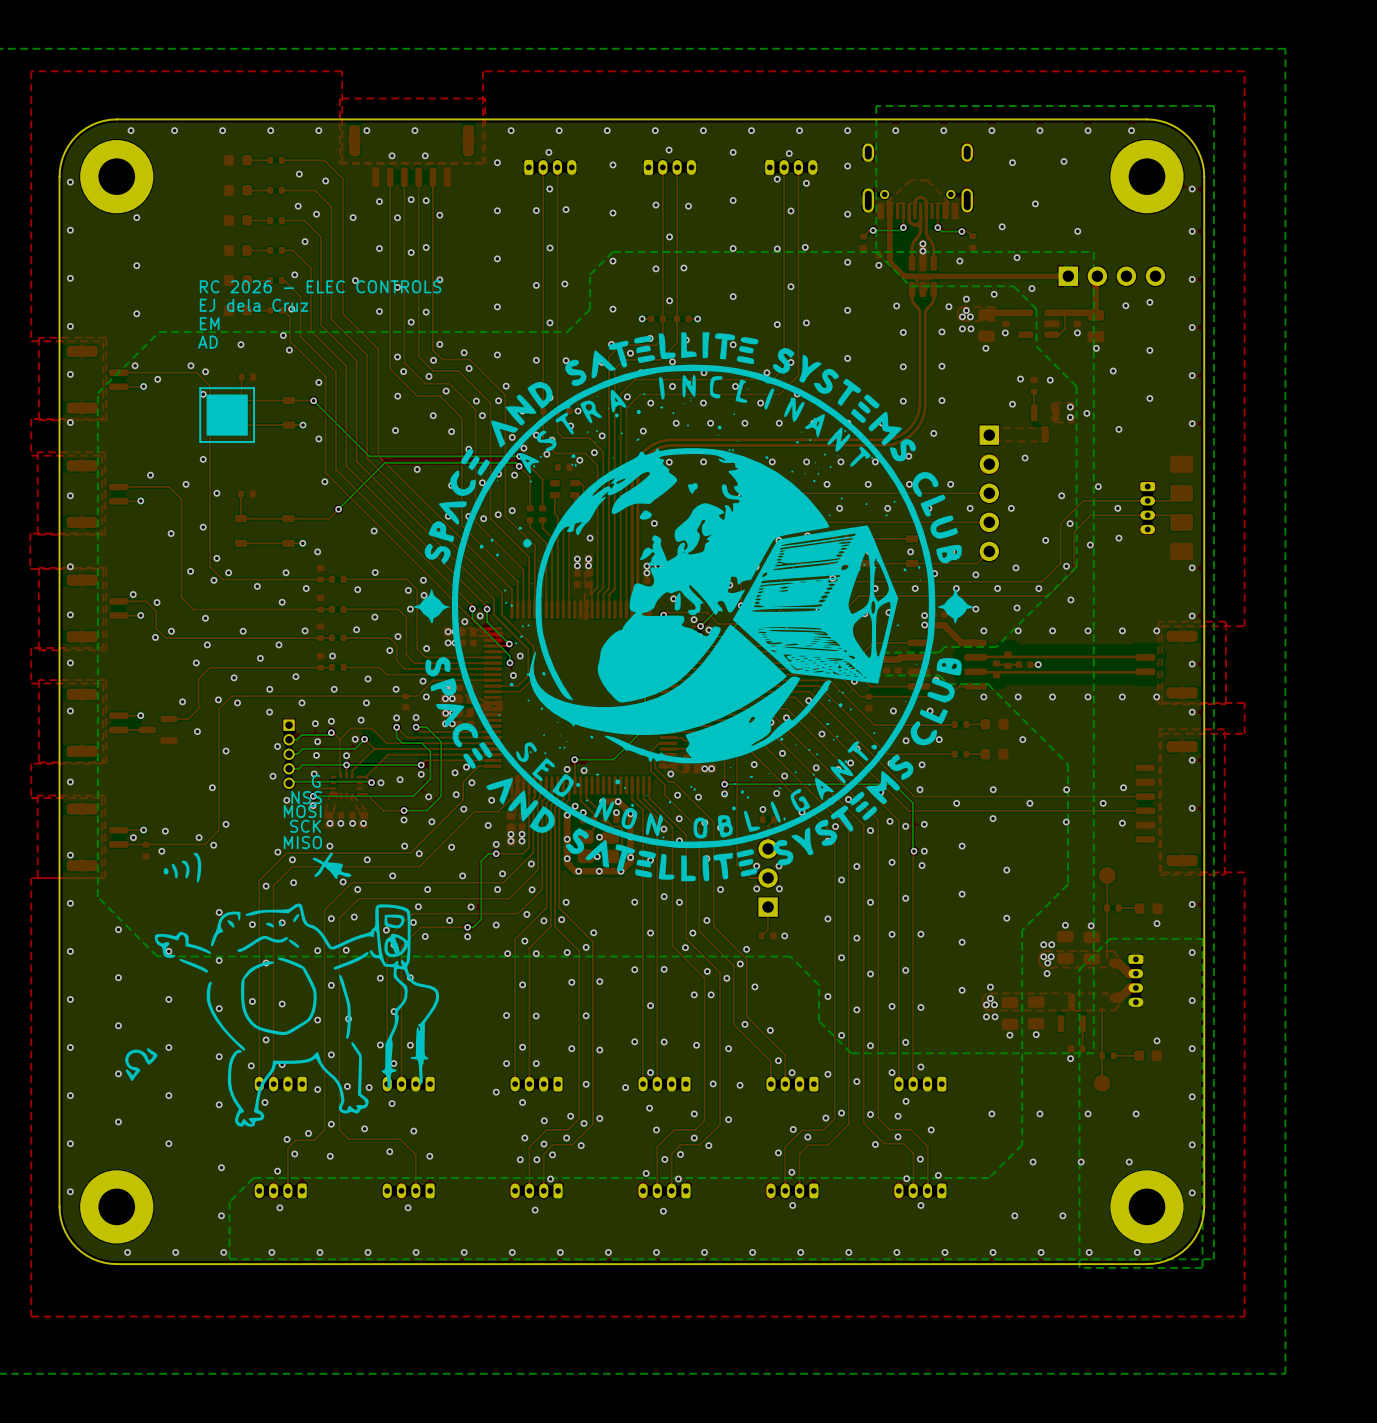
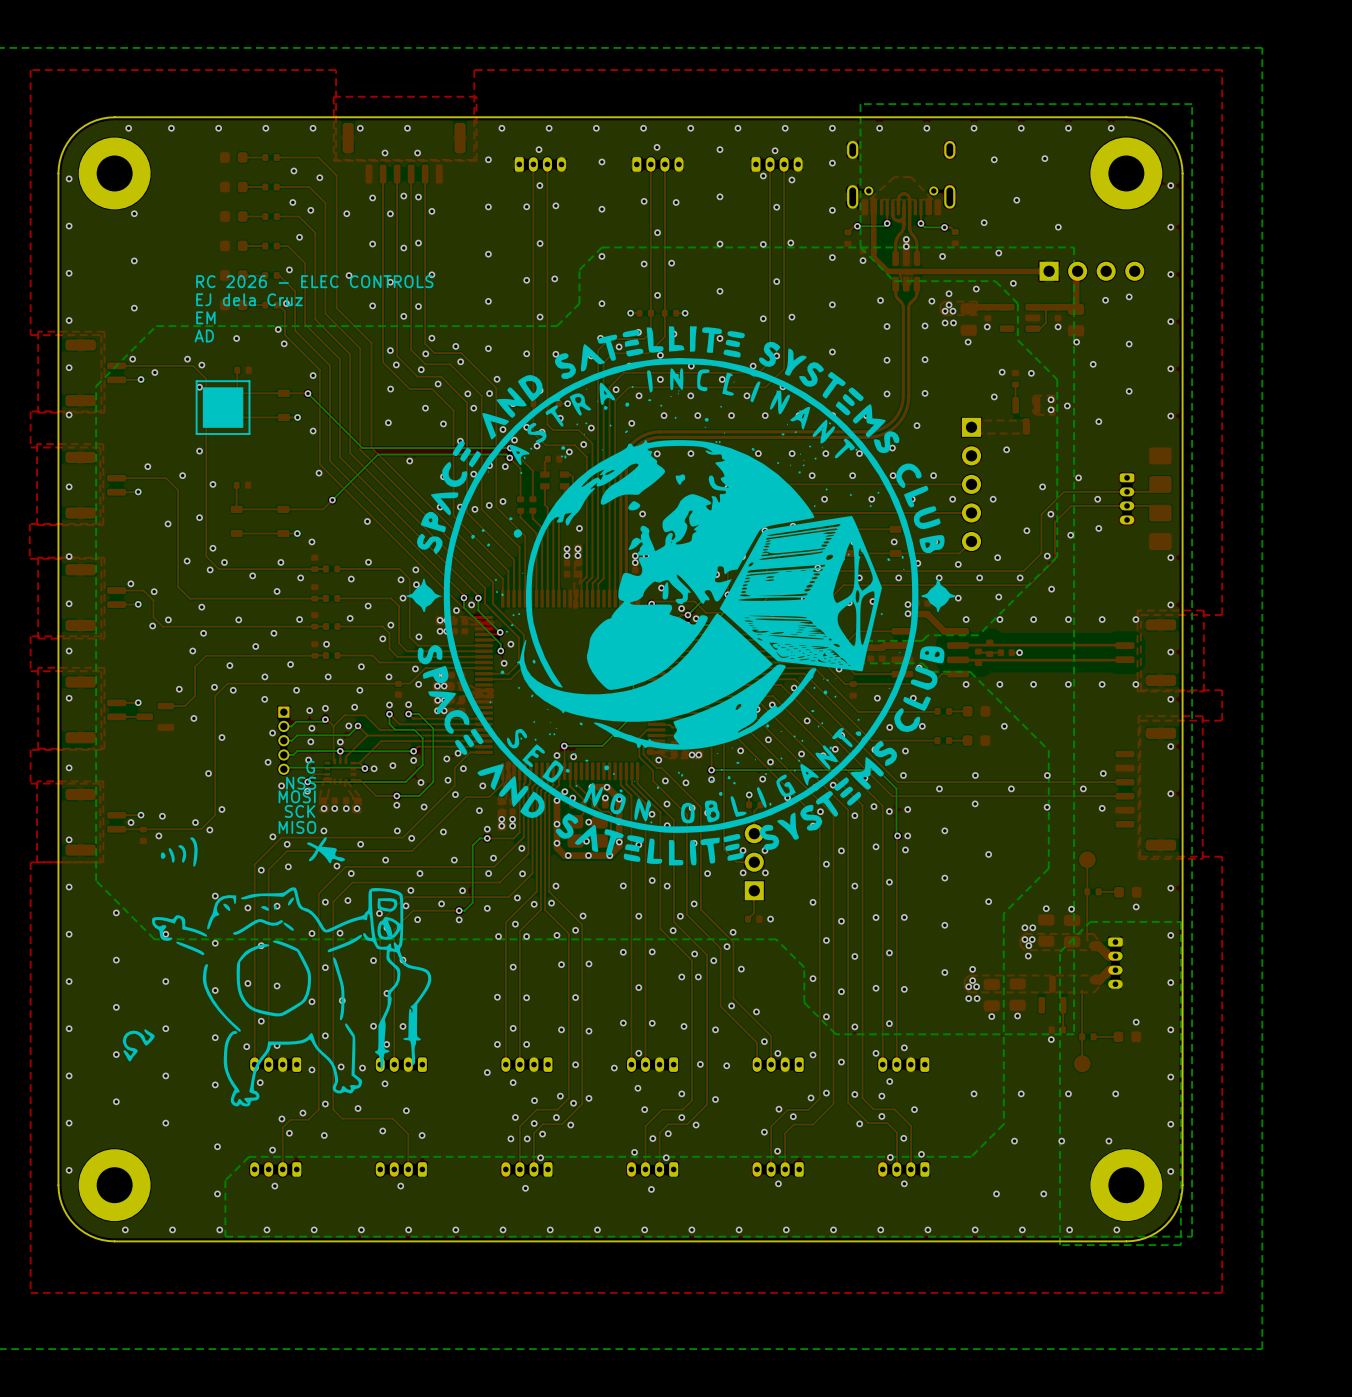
top track: none -> (547, 459) (544, 461) (544, 474)

